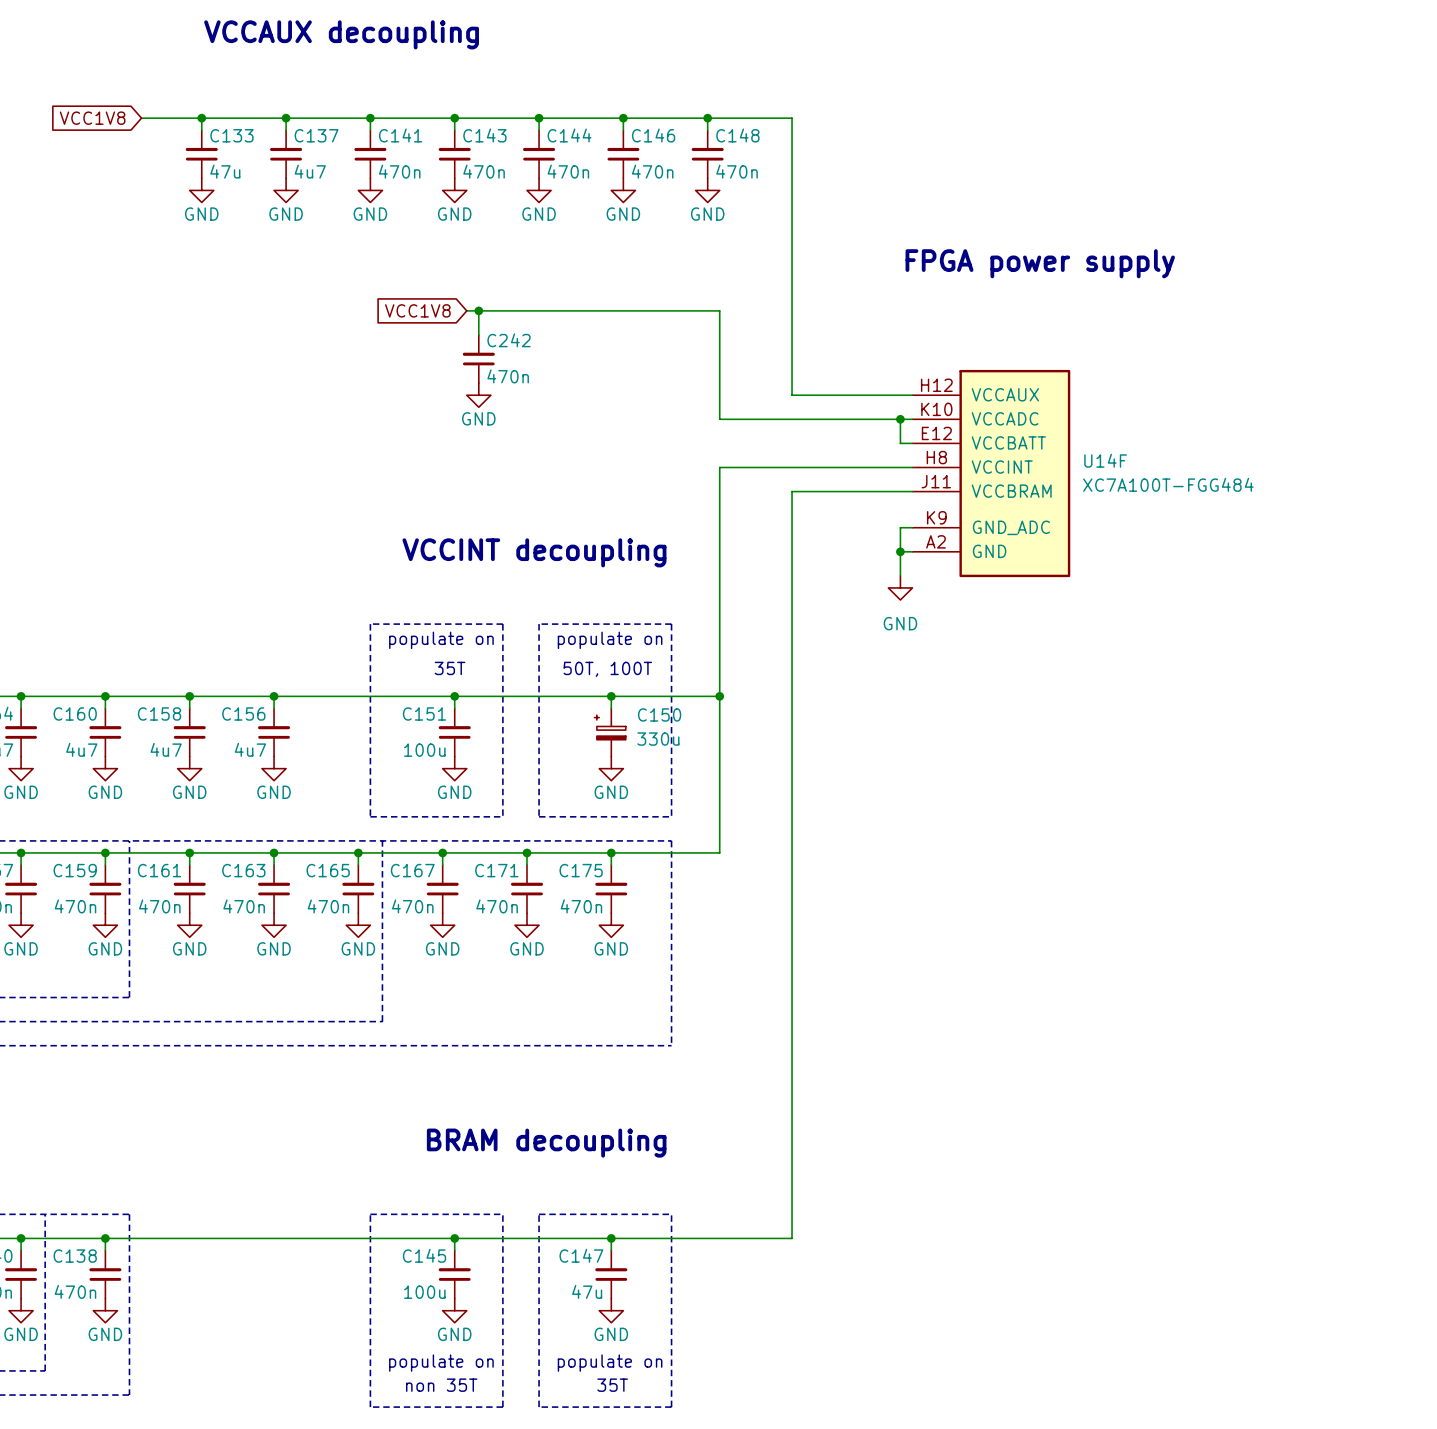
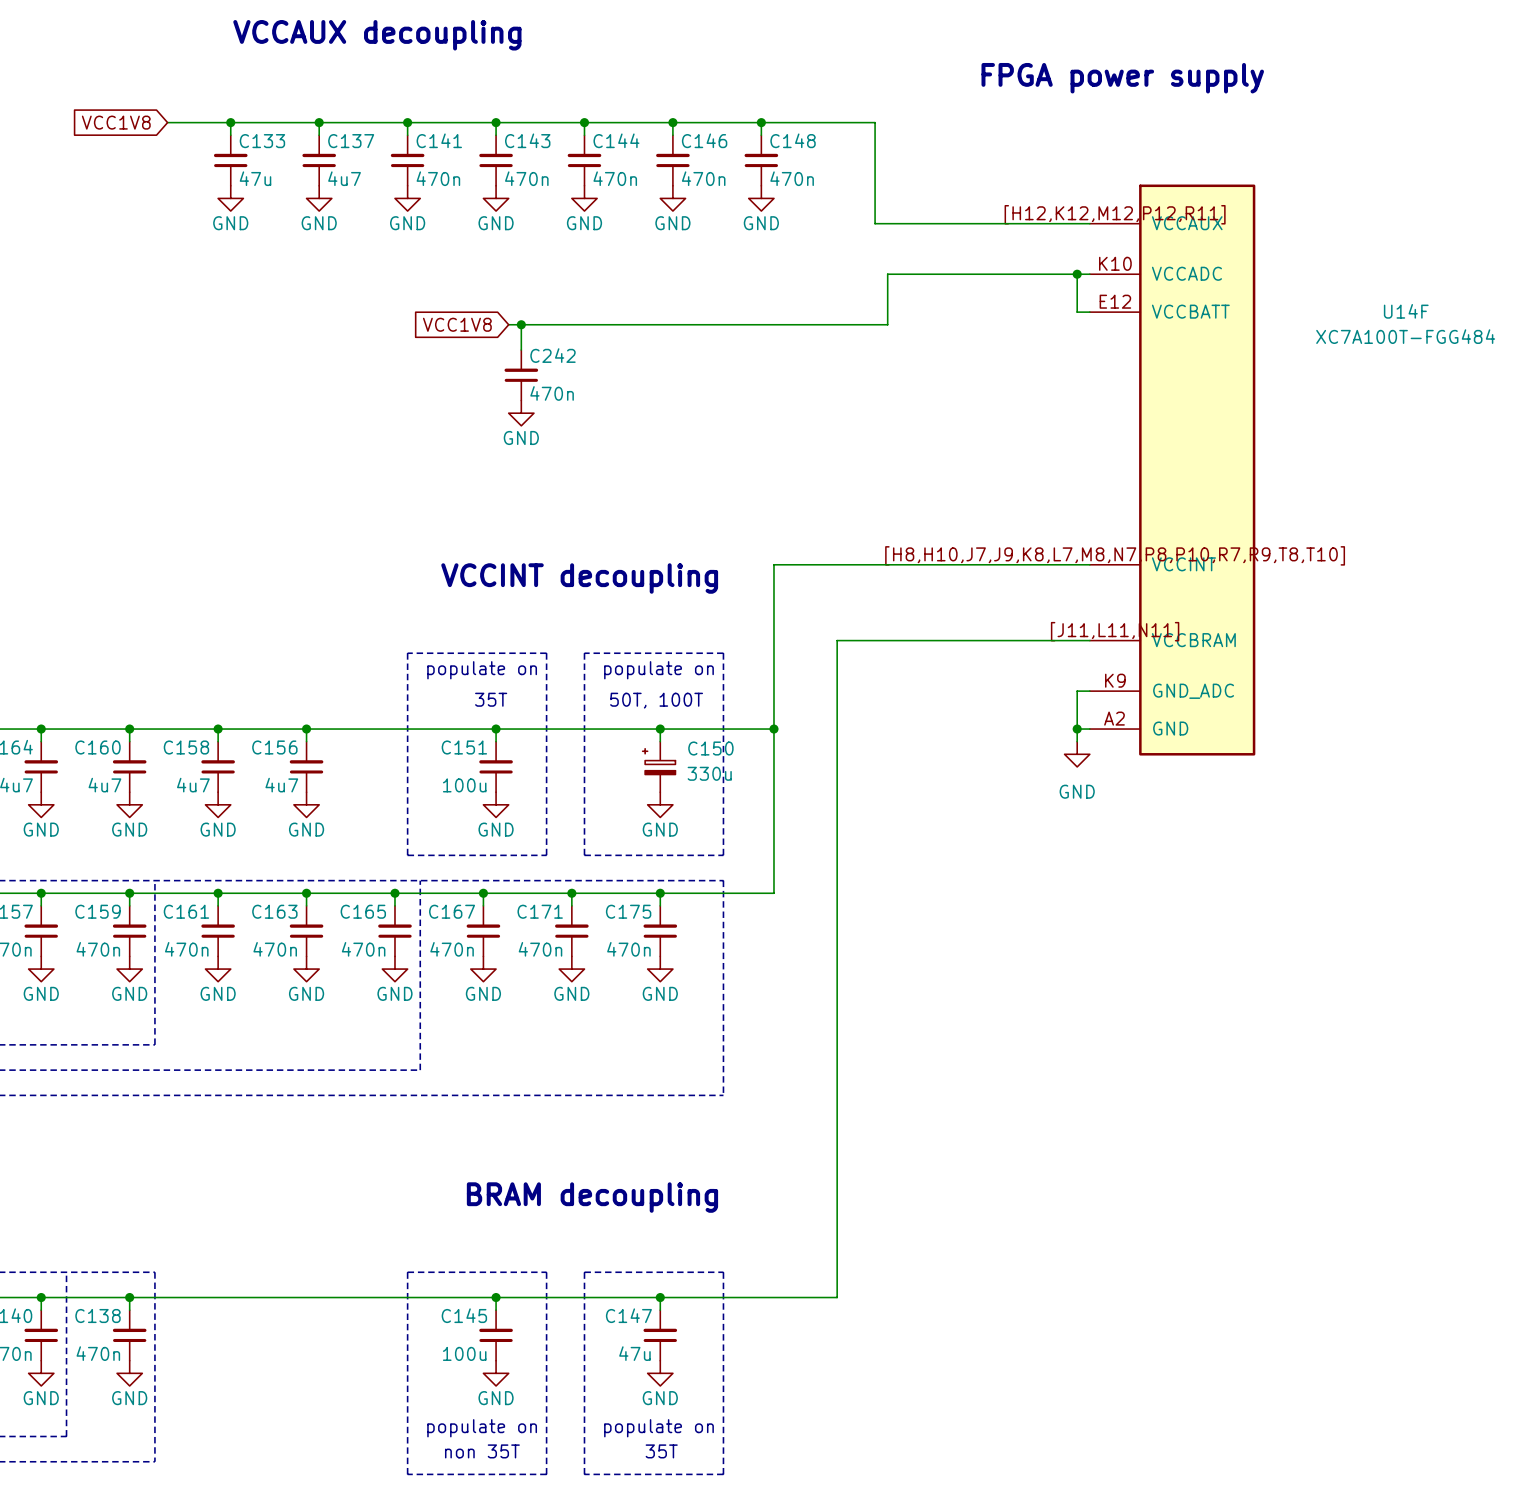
wire: (792, 118) (792, 395) (912, 395) -> (849, 122) (875, 122) (875, 223) (1089, 223)
wire: none -> (1077, 274) (1077, 312) (1089, 312)
junction: none -> (1077, 274)
text position: FPGA power supply (1040, 263) -> FPGA power supply (1122, 78)
wire: (719, 310) (719, 419) (912, 419) -> (773, 324) (887, 324) (887, 274) (1089, 274)
U14F symbol: [912, 369, 1071, 578] -> [1089, 184, 1256, 756]
wire: (900, 419) (900, 443) (912, 443) -> none
junction: (900, 419) -> none
U14F name position: U14F (1105, 460) -> U14F (1406, 311)
wire: (912, 467) (719, 467) (719, 539) -> (1089, 564) (773, 564)
U14F value position: XC7A100T-FGG484 (1168, 484) -> XC7A100T-FGG484 (1405, 336)
wire: (912, 491) (792, 491) (792, 1238) (779, 1238) -> (1089, 640) (837, 640) (837, 1297)
wire: (912, 527) (900, 527) (900, 575) -> (1089, 691) (1077, 691) (1077, 741)
wire: (900, 551) (912, 551) -> (1077, 729) (1089, 729)
junction: (900, 551) -> none
power symbol position: GND (900, 587) -> GND (1077, 754)
junction: none -> (1077, 729)

